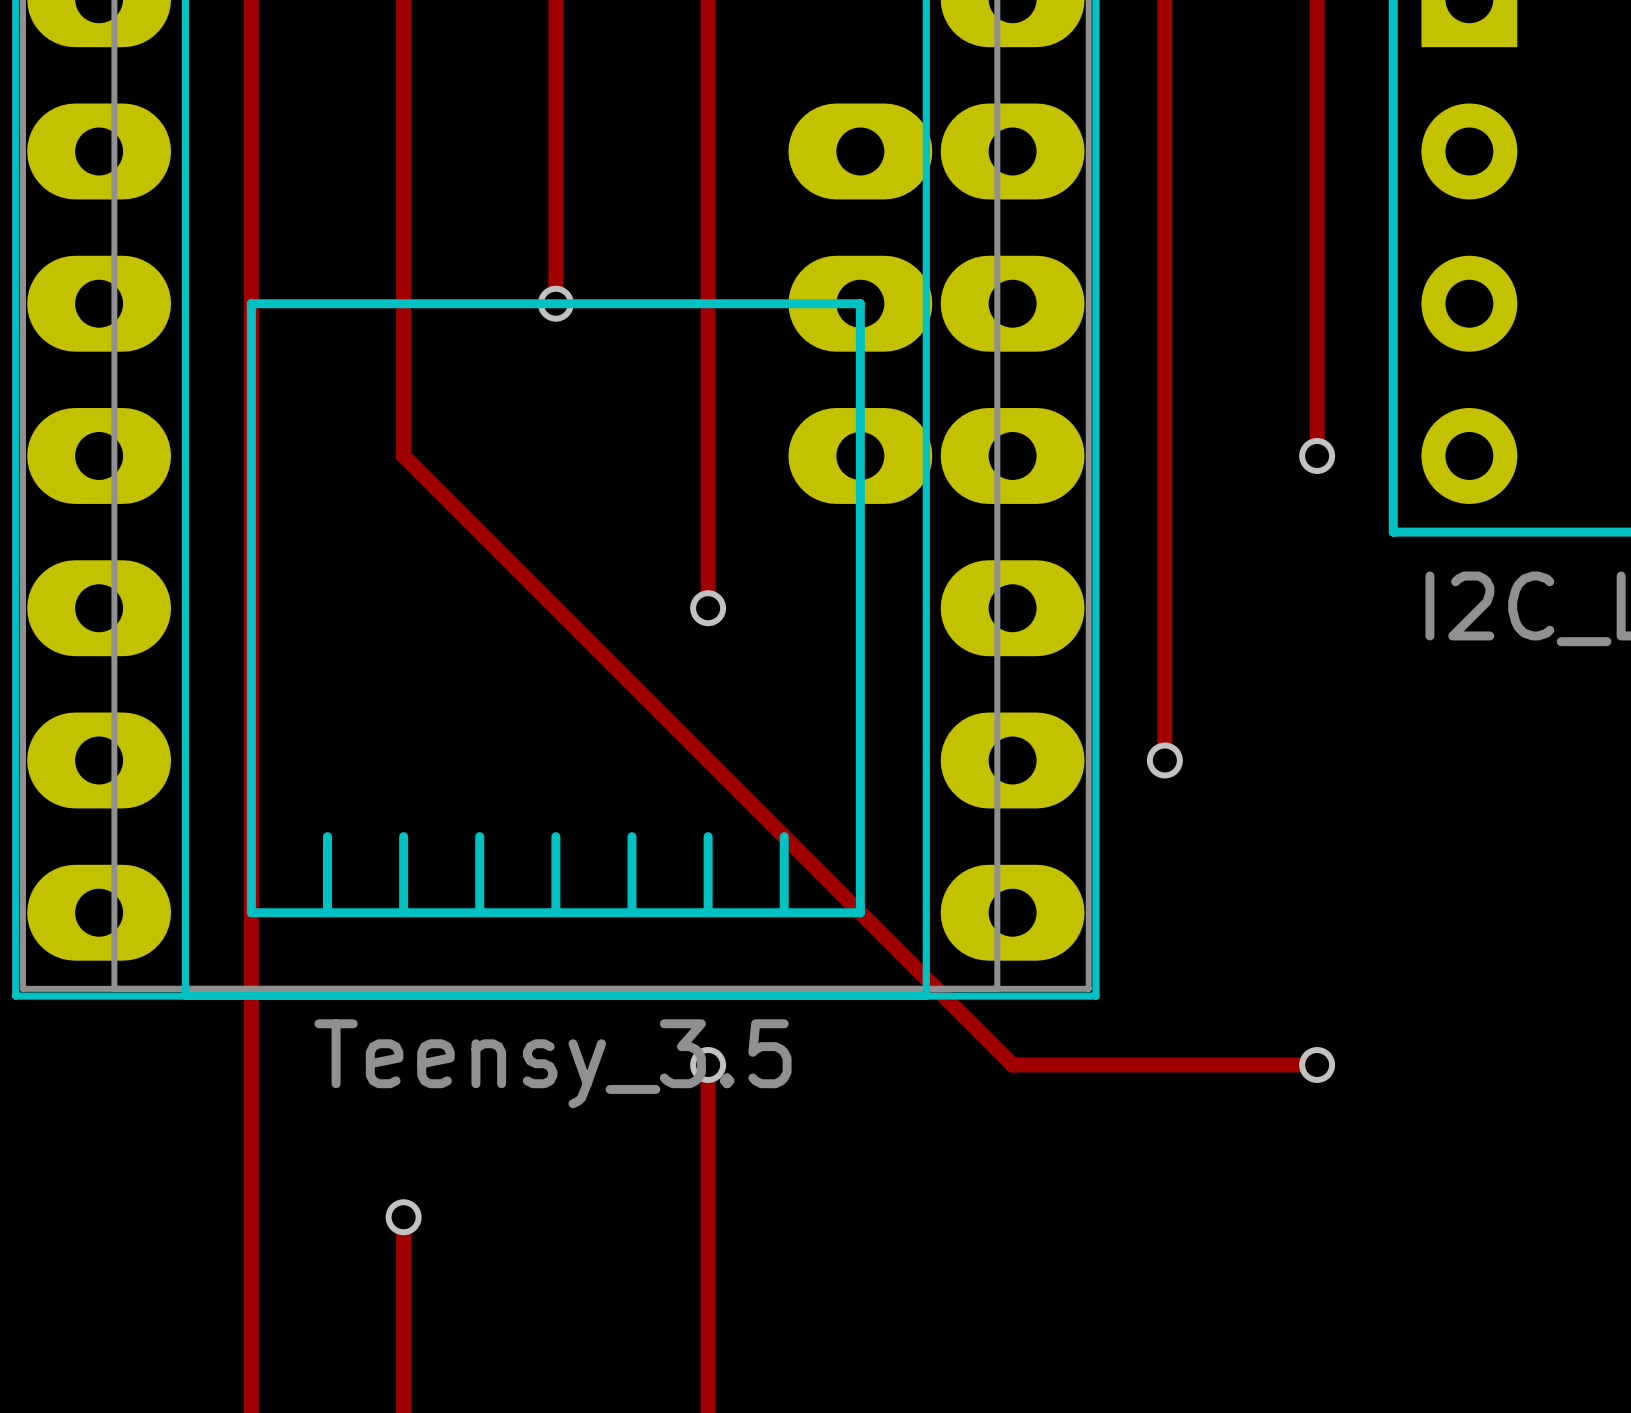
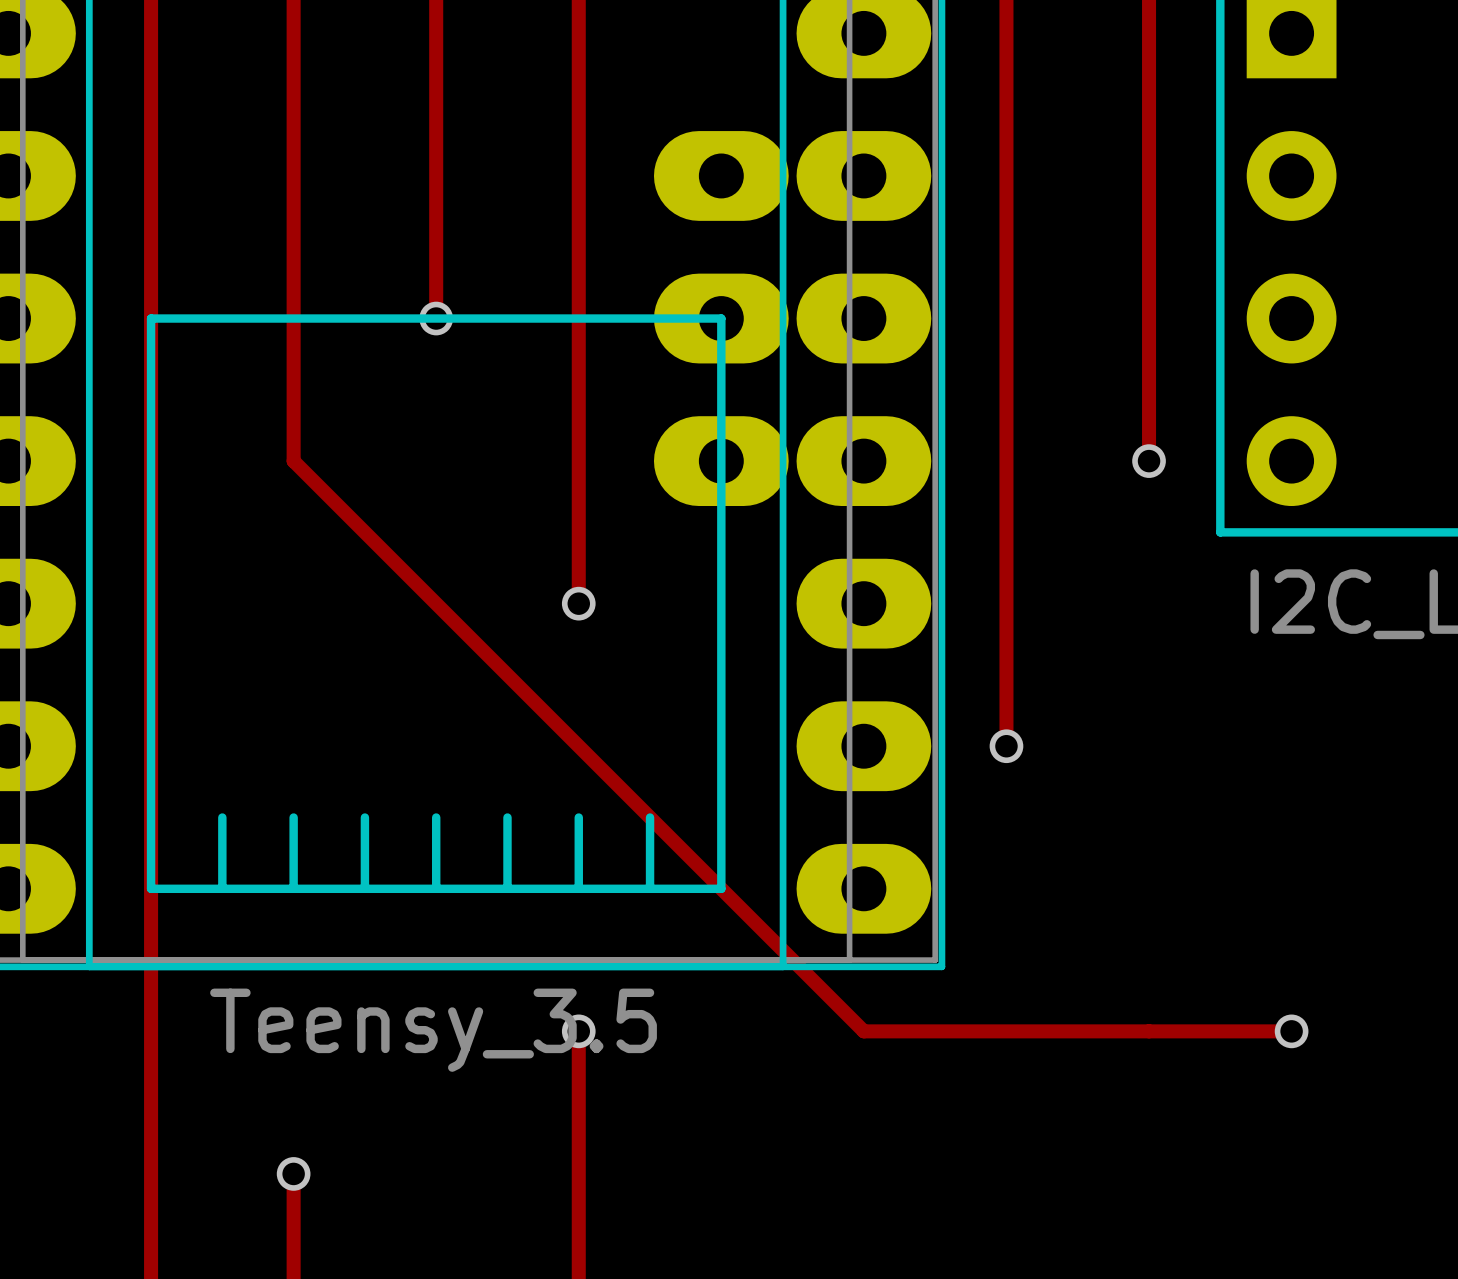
track: none -> (1149, 1031) (1291, 1031)
via position: (1317, 1064) -> (1291, 1031)

